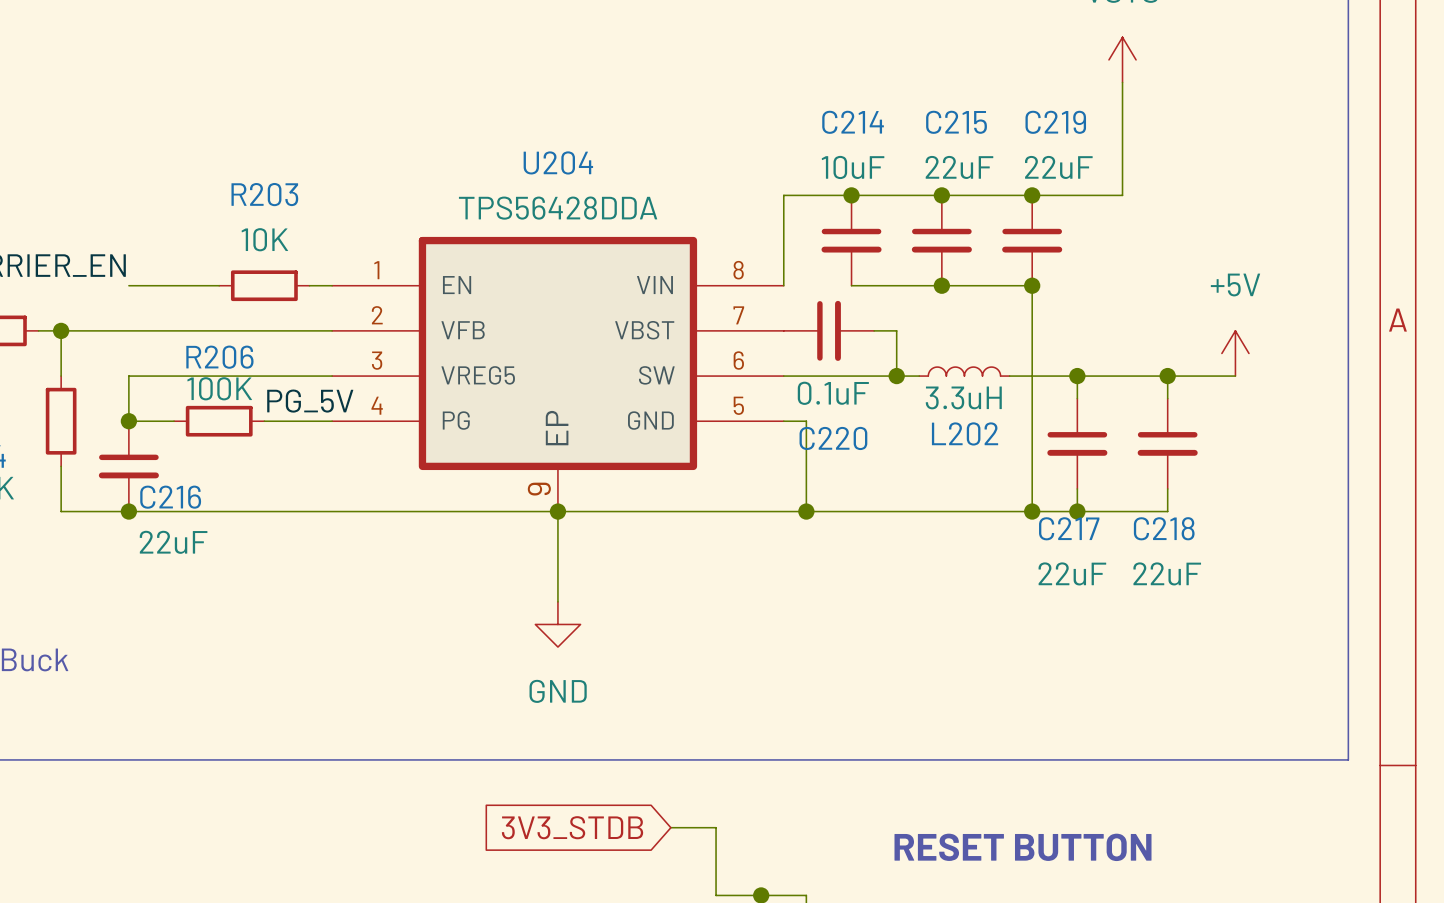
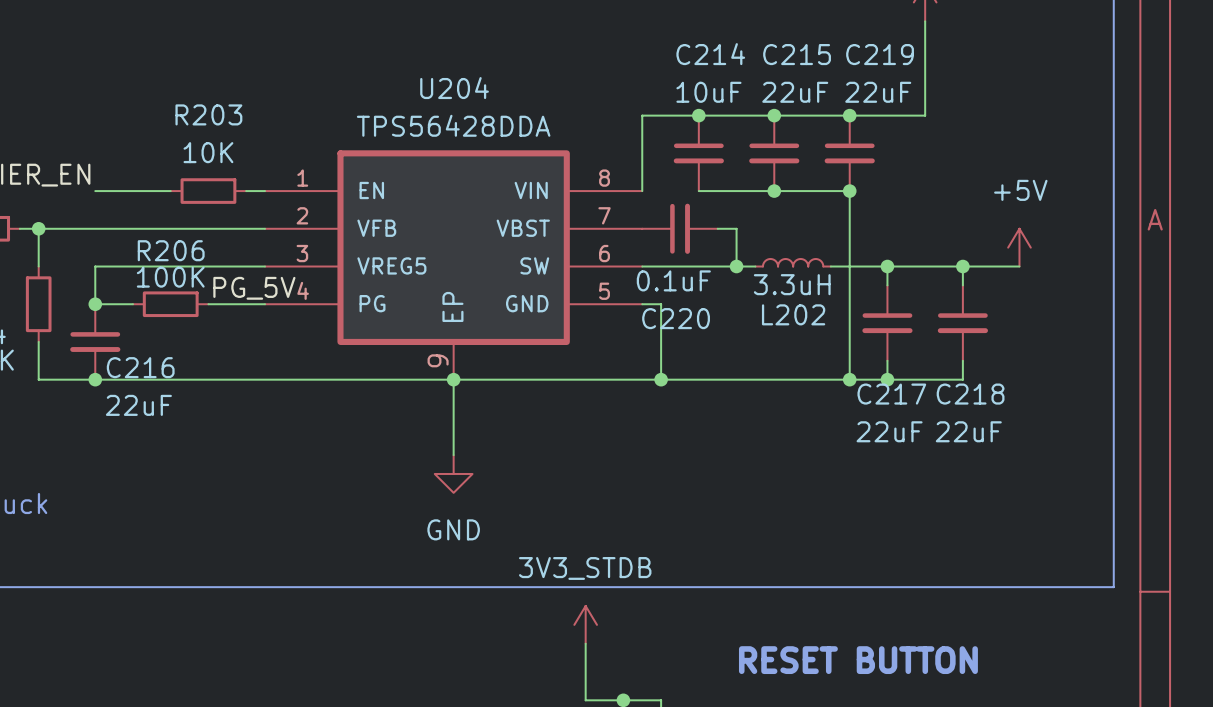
power symbol: none -> 3V3_STDB (585, 624)
global label: 3V3_STDB (572, 827) -> none
wire: (670, 827) (716, 827) -> none

